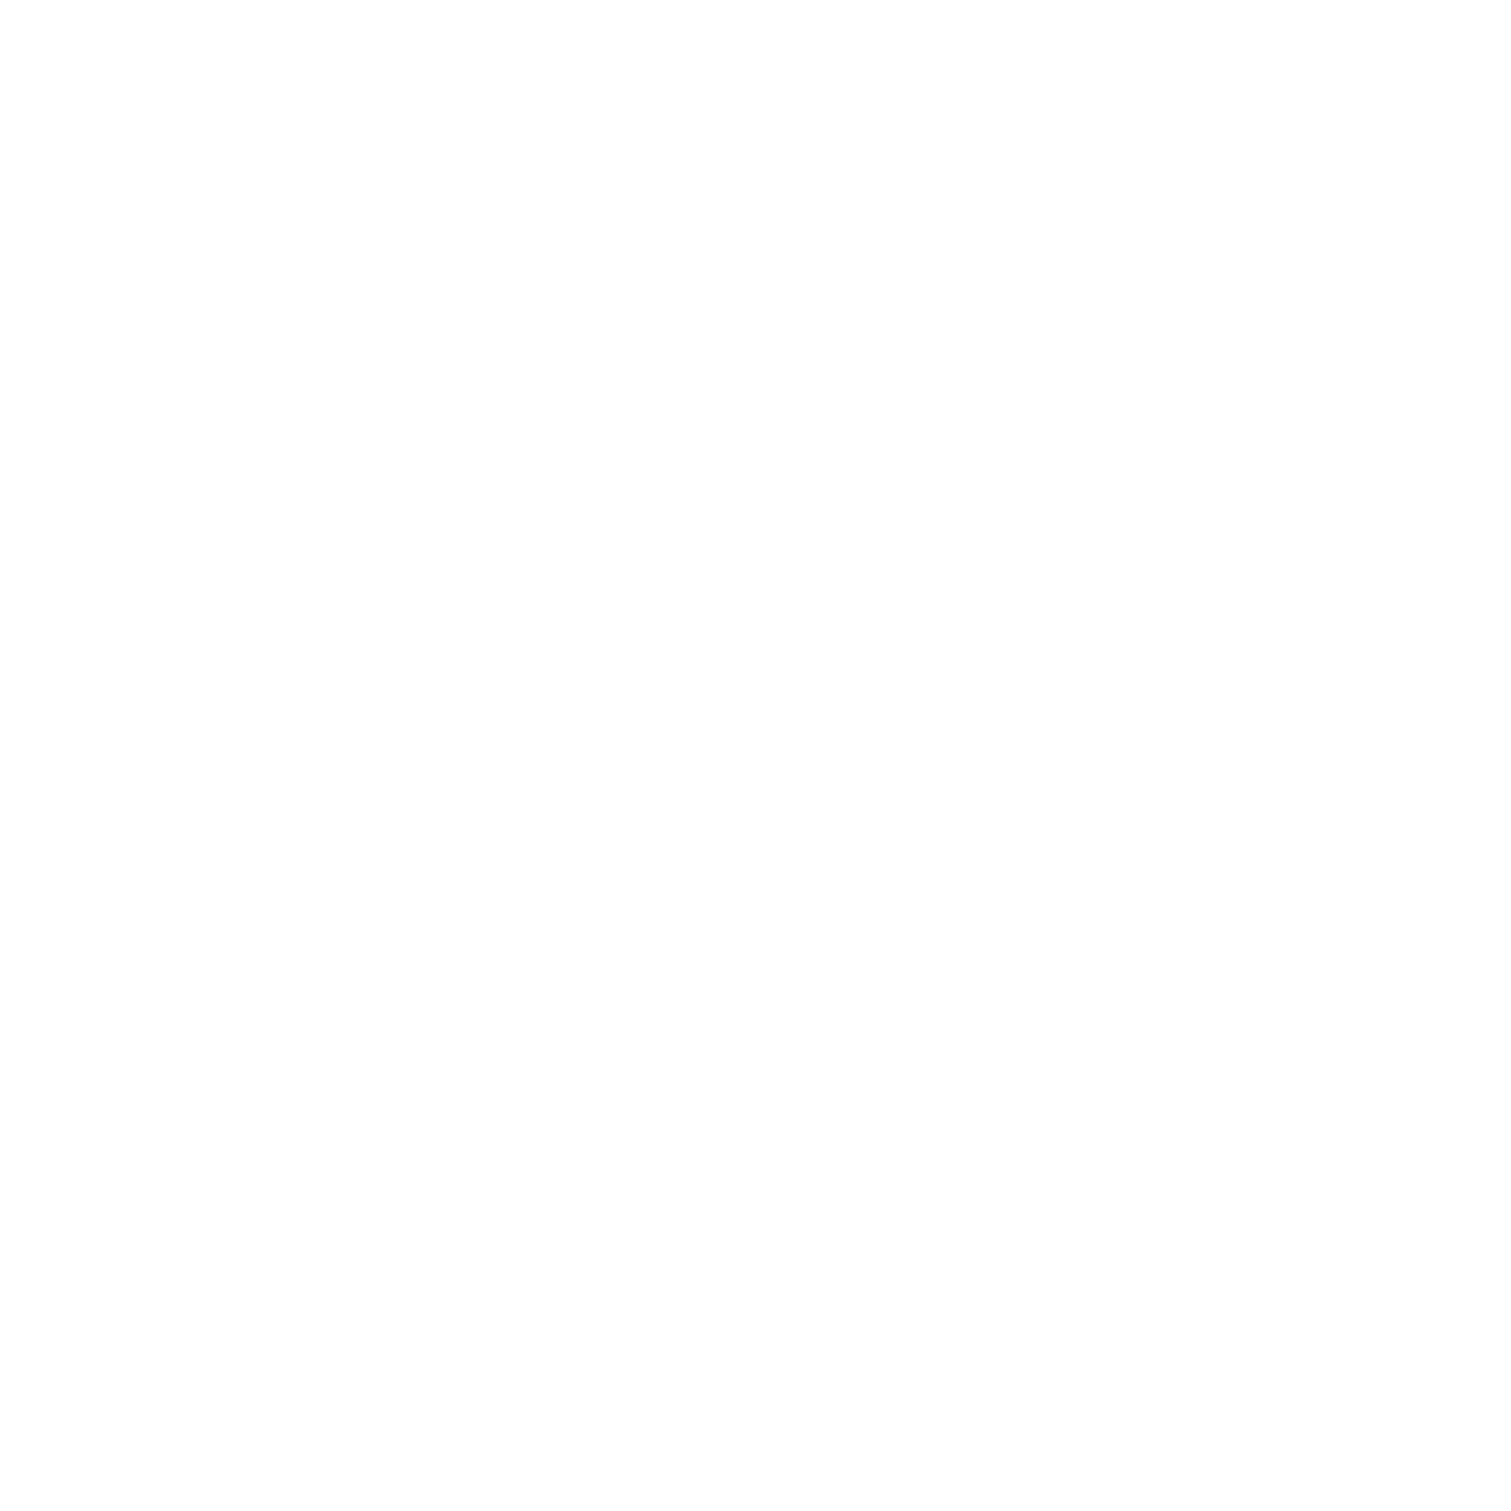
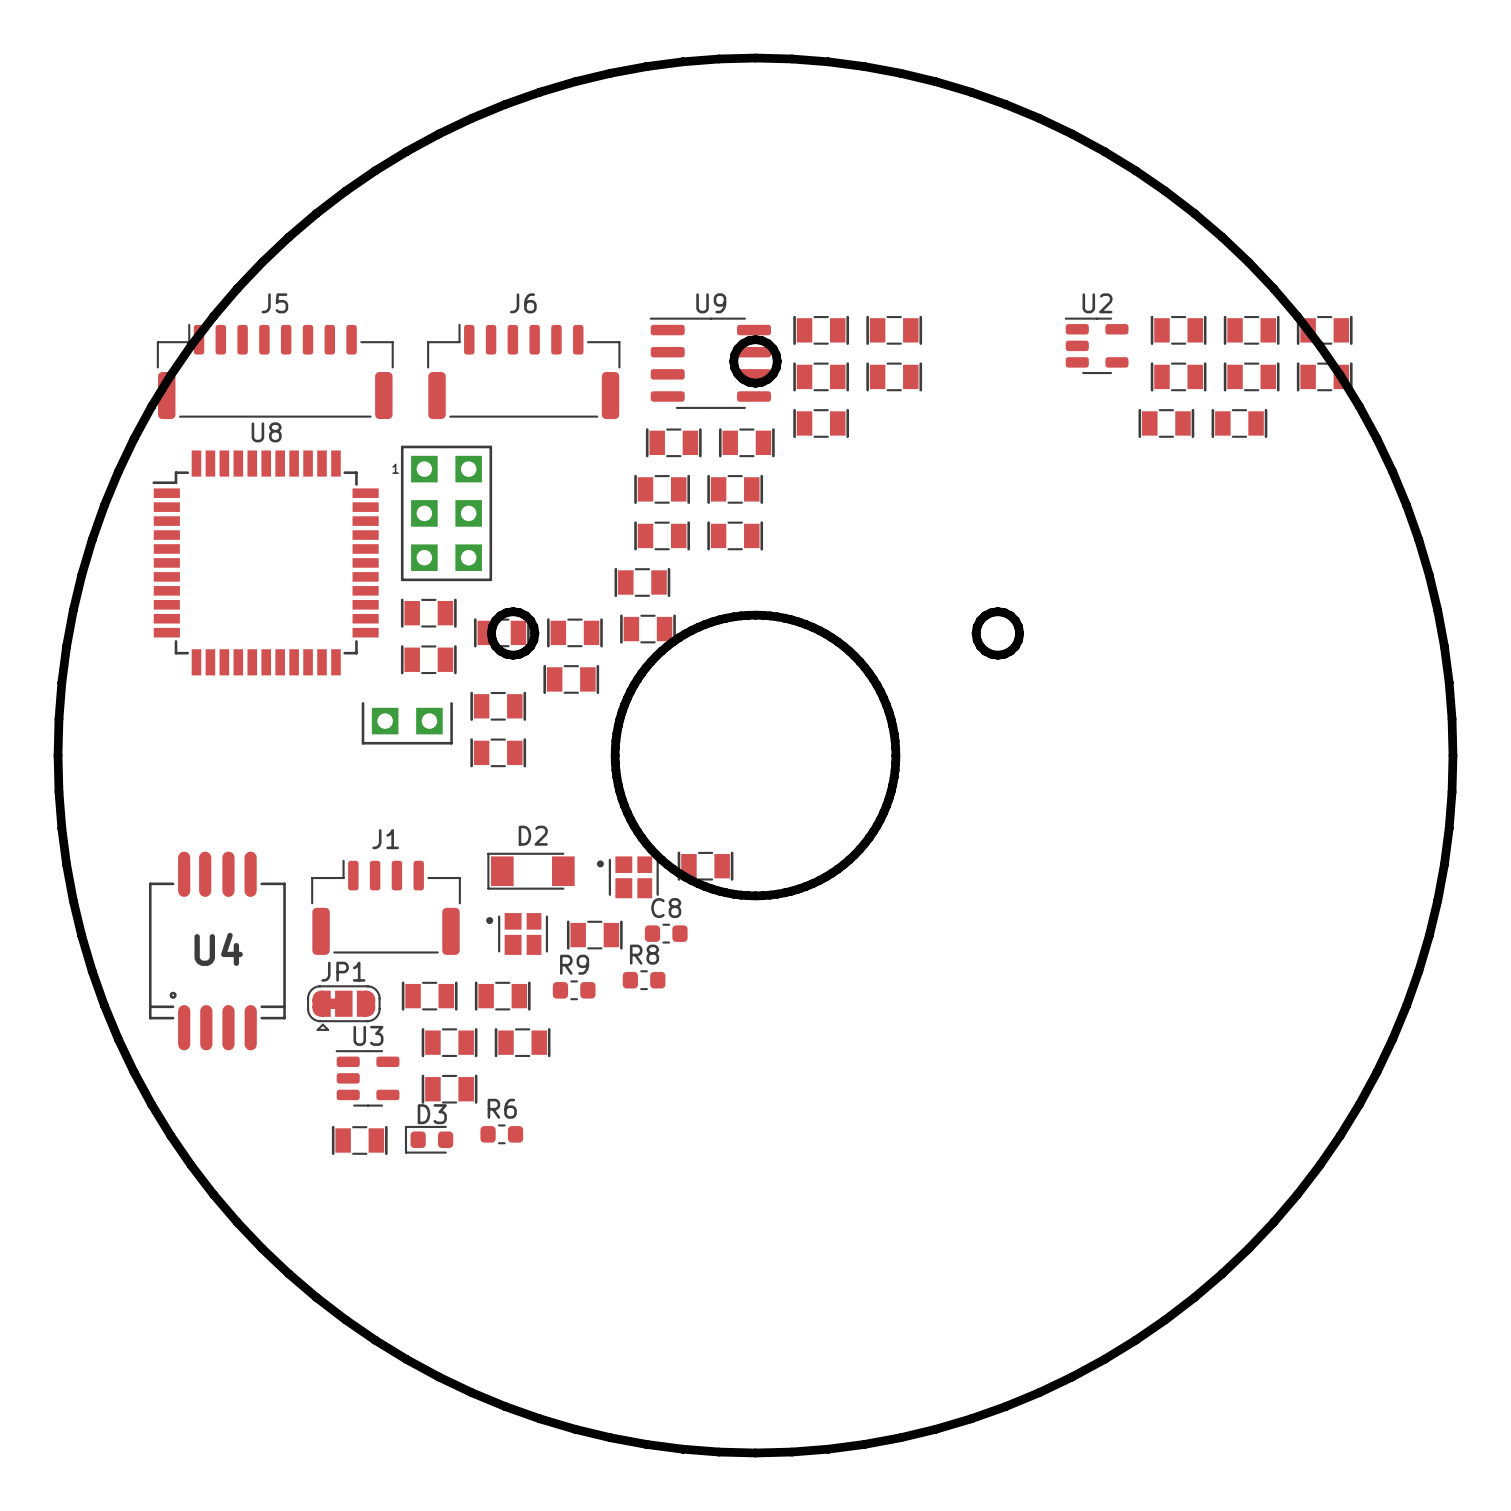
board edge: none -> (755, 58) (828, 61) (900, 73) (971, 92) (1039, 118) (1104, 151) (1165, 191) (1222, 237) (1248, 262) (1273, 288) (1319, 345) (1359, 406) (1392, 471) (1418, 539) (1437, 610) (1449, 682) (1452, 755) (1449, 828) (1437, 900) (1418, 971) (1392, 1039) (1359, 1104) (1319, 1165) (1273, 1222) (1248, 1248) (1222, 1273) (1165, 1319) (1104, 1359) (1039, 1392) (971, 1418) (900, 1437) (828, 1449) (755, 1452) (682, 1449) (610, 1437) (539, 1418) (471, 1392) (406, 1359) (345, 1319) (288, 1273) (262, 1248) (237, 1222) (191, 1165) (151, 1104) (118, 1039) (92, 971) (73, 900) (61, 828) (58, 755) (61, 682) (73, 610) (92, 539) (118, 471) (151, 406) (191, 345) (237, 288) (262, 262) (288, 237) (345, 191) (406, 151) (471, 118) (539, 92) (610, 73) (682, 61) (755, 58)
part: none -> (821, 330)
part: none -> (894, 330)
part: none -> (1178, 330)
part: none -> (1251, 330)
part: none -> (1324, 330)
board edge: none -> (755, 339) (742, 343) (734, 354) (733, 361) (734, 368) (742, 379) (755, 383) (768, 379) (776, 368) (777, 361) (776, 354) (768, 343) (755, 339)
U2: none -> (1096, 345)
U9: none -> (710, 363)
J5: none -> (275, 371)
J6: none -> (523, 371)
part: none -> (821, 376)
part: none -> (894, 376)
part: none -> (1178, 376)
part: none -> (1251, 376)
part: none -> (1324, 376)
part: none -> (821, 423)
part: none -> (1166, 423)
part: none -> (1239, 423)
part: none -> (673, 442)
part: none -> (746, 442)
part: none -> (662, 489)
part: none -> (735, 489)
part: none -> (446, 513)
part: none -> (662, 535)
part: none -> (735, 535)
U8: none -> (265, 562)
part: none -> (642, 582)
board edge: none -> (513, 611) (506, 612) (495, 620) (491, 633) (495, 646) (506, 654) (513, 655) (519, 654) (530, 646) (534, 633) (530, 620) (519, 612) (513, 611)
board edge: none -> (997, 611) (991, 612) (980, 620) (976, 633) (980, 646) (991, 654) (997, 655) (1004, 654) (1015, 646) (1019, 633) (1015, 620) (1004, 612) (997, 611)
part: none -> (428, 613)
board edge: none -> (755, 615) (726, 618) (705, 624) (679, 637) (656, 656) (637, 679) (624, 705) (618, 726) (615, 755) (618, 784) (624, 805) (637, 831) (656, 854) (679, 873) (705, 886) (726, 892) (755, 895) (784, 892) (805, 886) (831, 873) (854, 854) (873, 831) (886, 805) (892, 784) (895, 755) (892, 726) (886, 705) (873, 679) (854, 656) (831, 637) (805, 624) (784, 618) (755, 615)
part: none -> (647, 629)
part: none -> (501, 632)
part: none -> (574, 632)
part: none -> (428, 659)
part: none -> (571, 679)
part: none -> (498, 706)
part: none -> (407, 723)
part: none -> (498, 752)
part: none -> (705, 866)
D2: none -> (531, 871)
part: none -> (627, 877)
J1: none -> (386, 907)
part: none -> (517, 933)
C8: none -> (666, 933)
part: none -> (594, 935)
U4: none -> (217, 950)
R8: none -> (644, 980)
R9: none -> (574, 990)
part: none -> (429, 996)
part: none -> (502, 996)
JP1: none -> (343, 1008)
part: none -> (449, 1042)
part: none -> (522, 1042)
U3: none -> (367, 1078)
part: none -> (449, 1089)
R6: none -> (501, 1134)
D3: none -> (429, 1139)
part: none -> (359, 1140)

